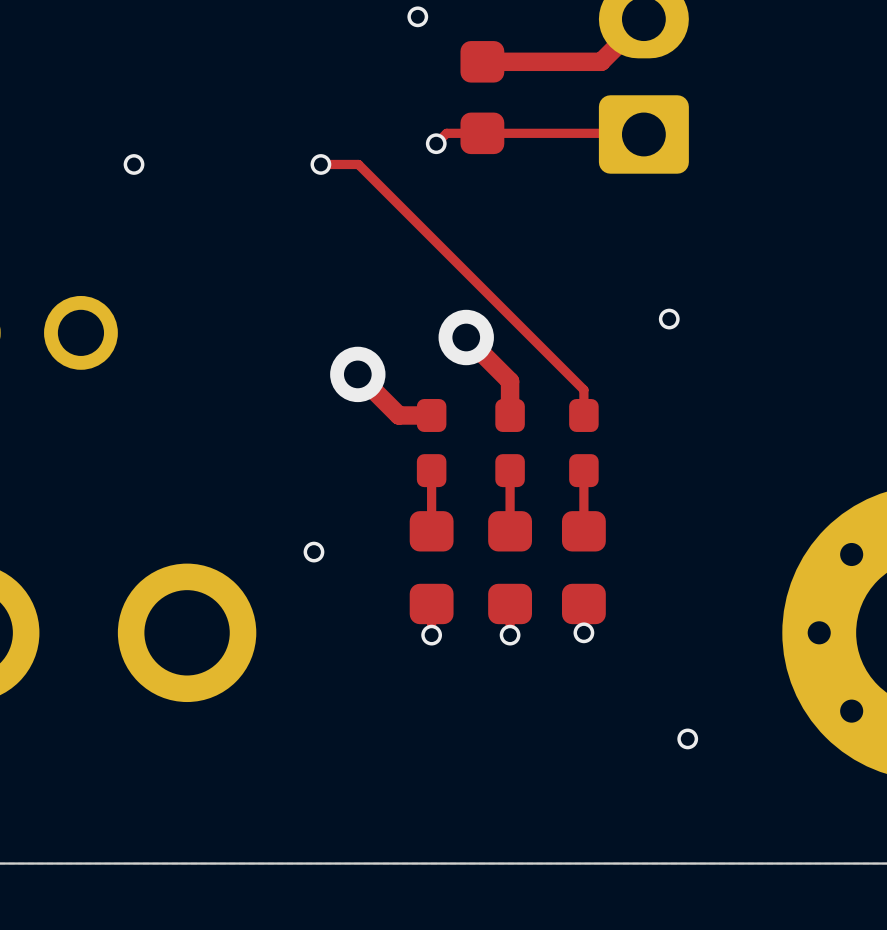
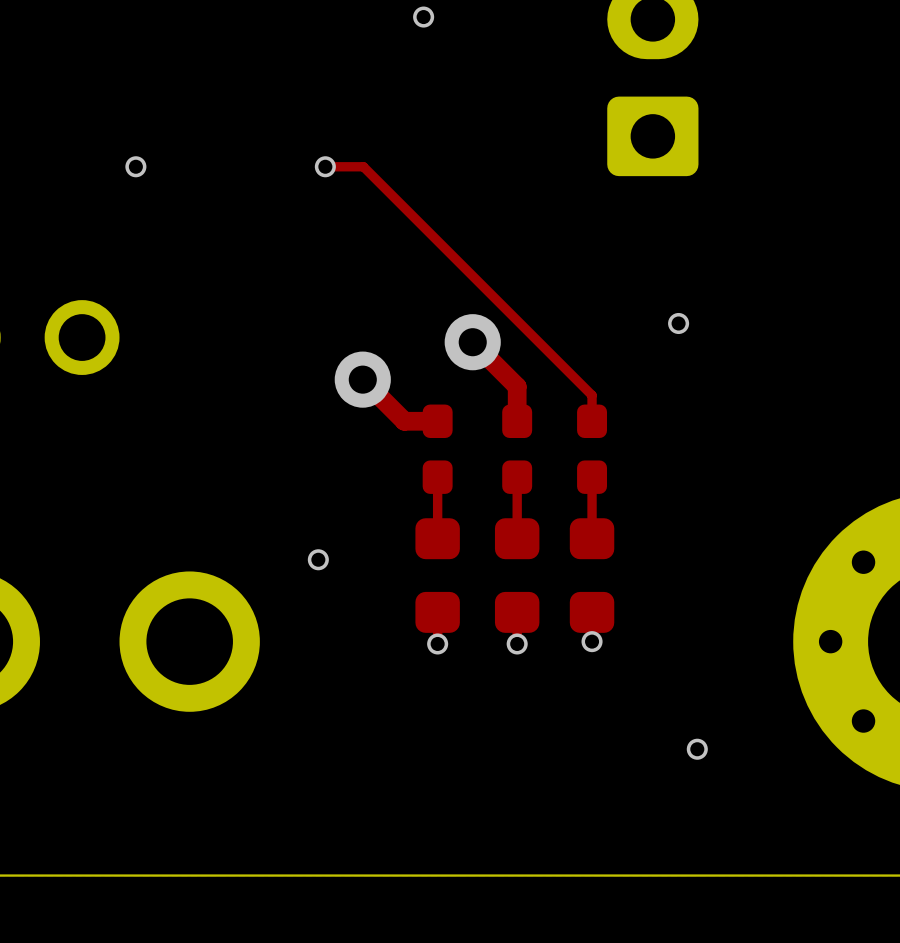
top track: (643, 19) (601, 61) (482, 61) -> none
part: (482, 97) -> none
top track: (643, 134) (446, 133) (436, 143) -> none
via: (436, 143) -> none

